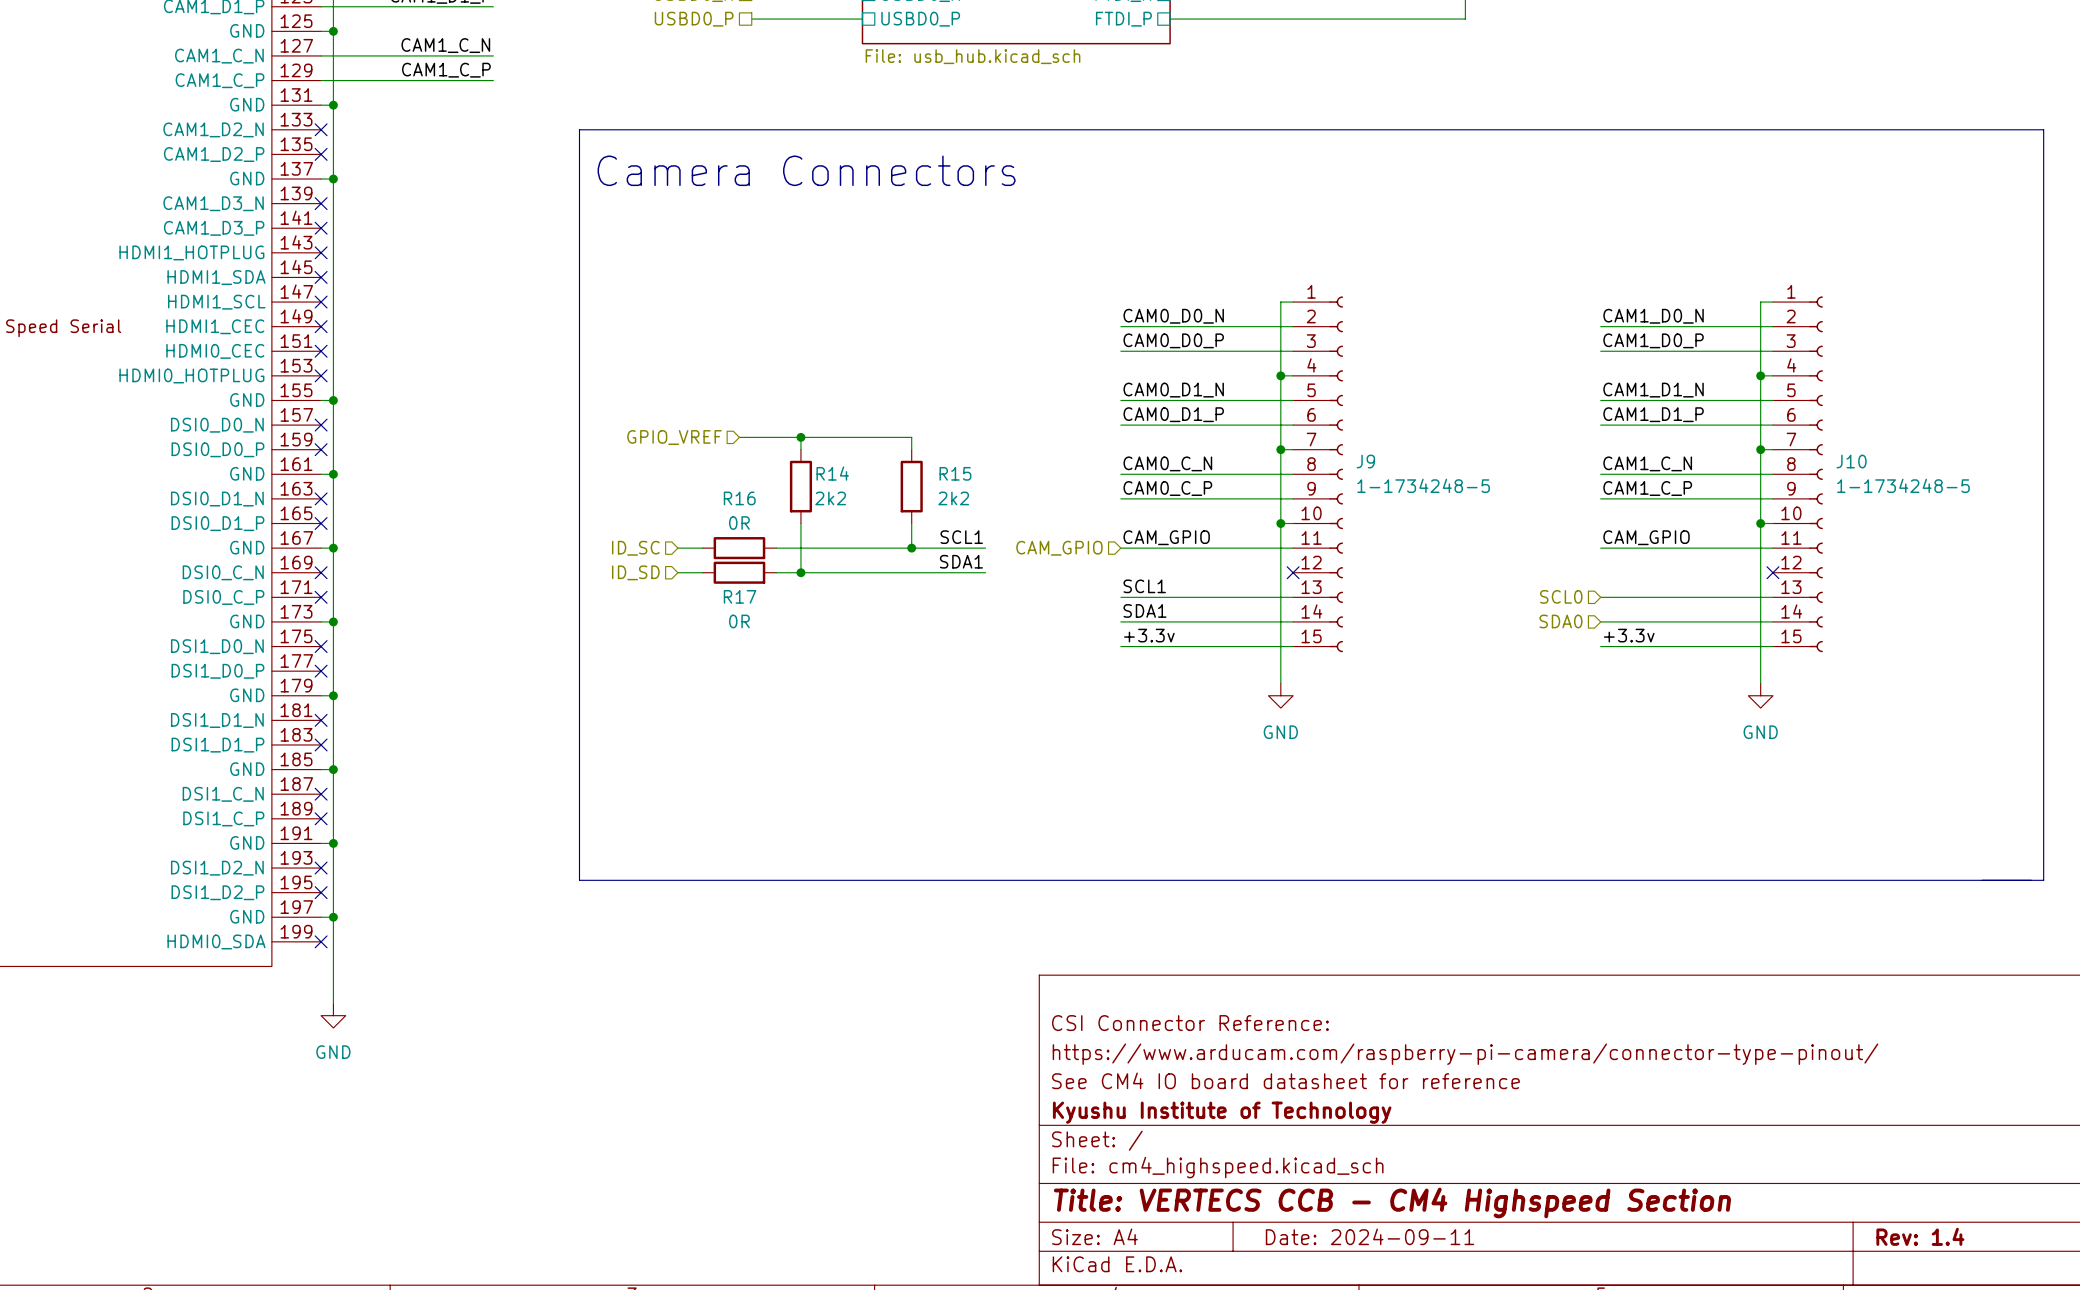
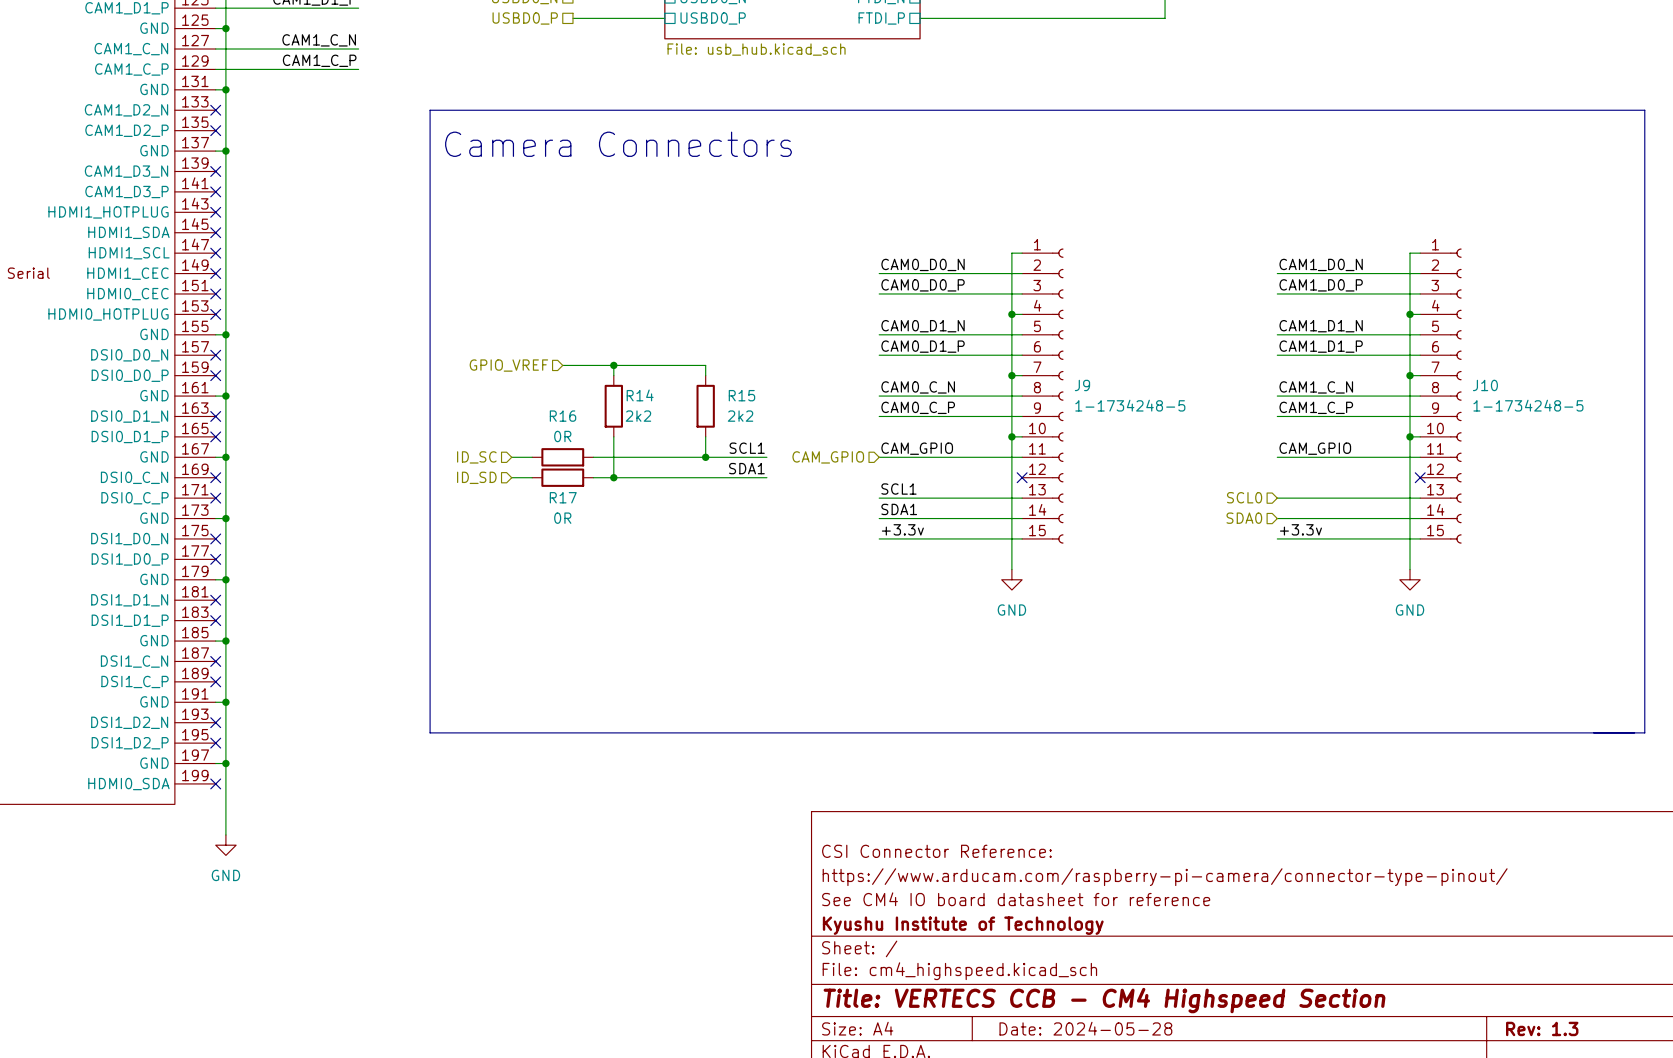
title block: Date: 2024-09-11 (1370, 1236) -> Date: 2024-05-28 (1085, 1028)
title block: Rev: 1.4 (1920, 1236) -> Rev: 1.3 (1542, 1028)

